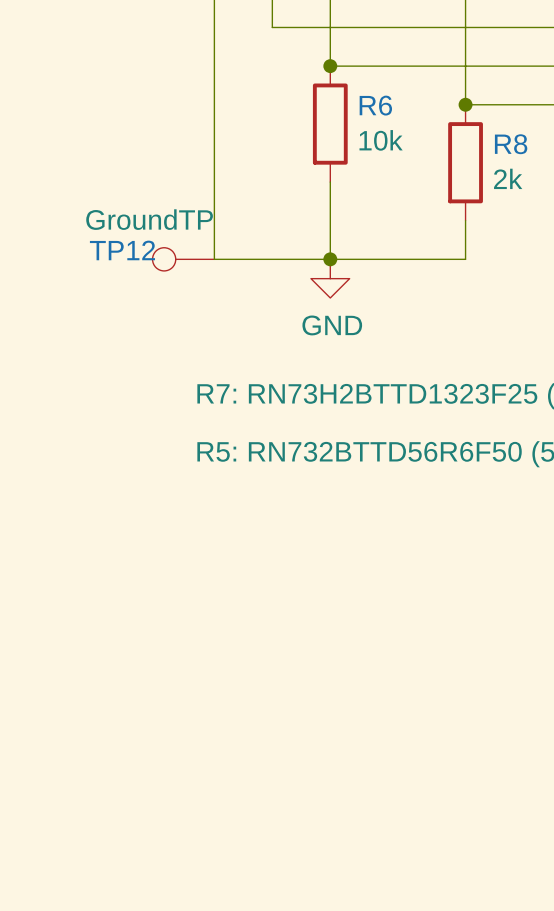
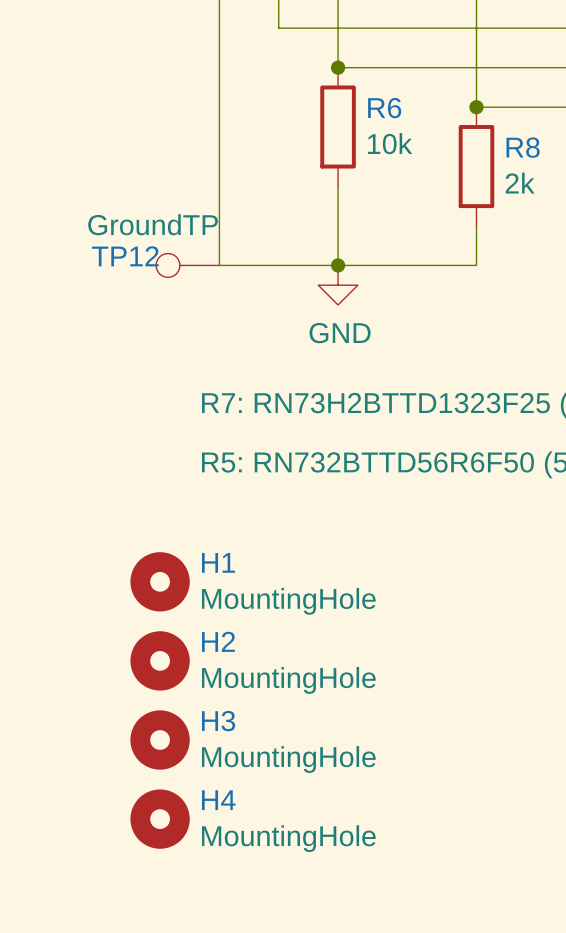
H1: none -> MountingHole (160, 581)
H2: none -> MountingHole (160, 660)
H3: none -> MountingHole (160, 740)
H4: none -> MountingHole (160, 819)

